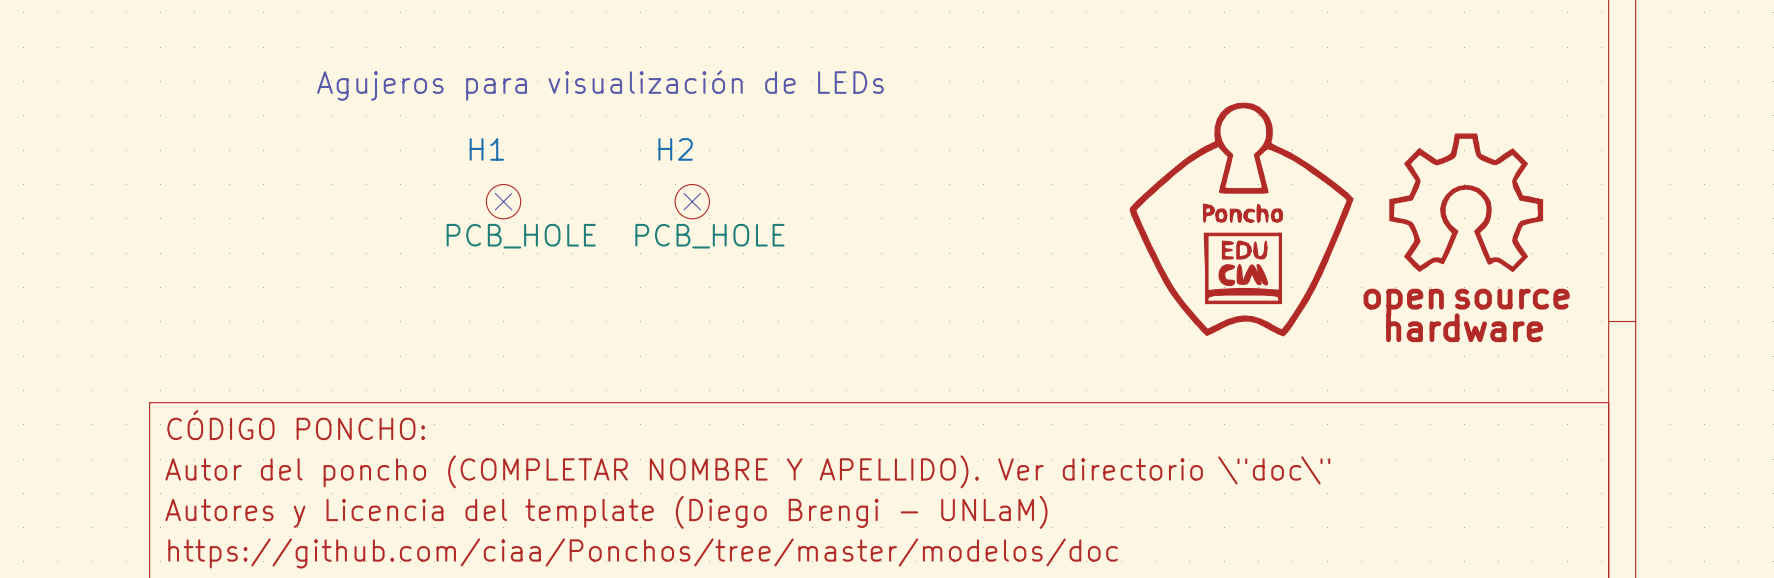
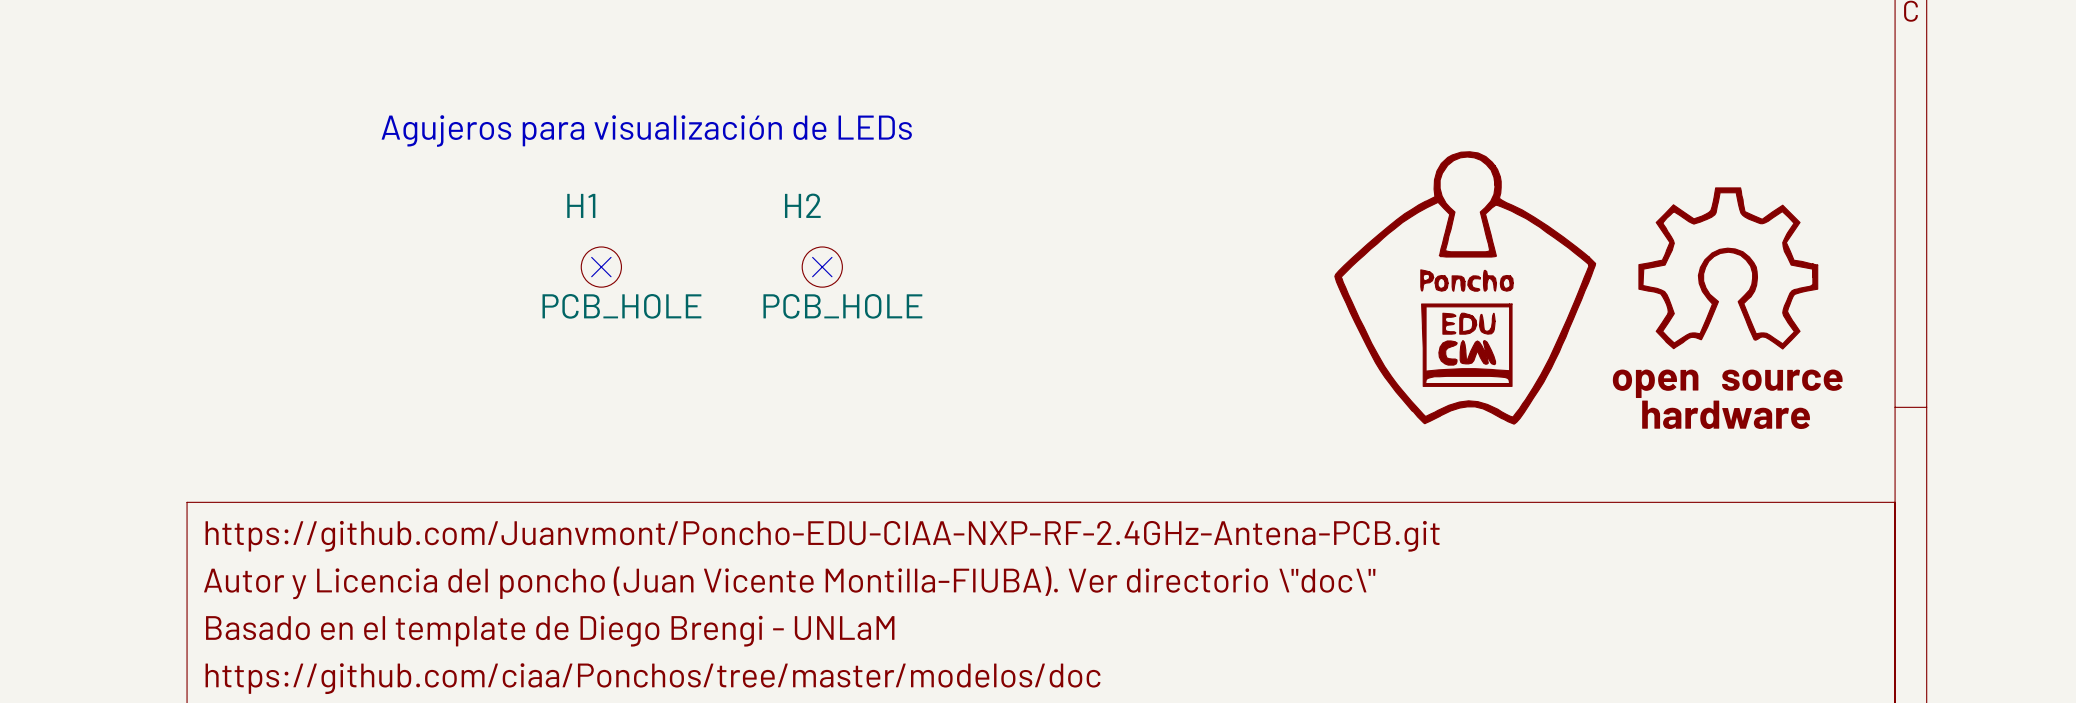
title block: CÓDIGO PONCHO: (296, 425) -> https://github.com/Juanvmont/Poncho-EDU-CIAA-NXP-RF-2.4GHz-Antena-PCB.git (822, 536)
title block: Autor del poncho (COMPLETAR NOMBRE Y APELLIDO). Ver directorio \"doc\" (747, 471) -> Autor y Licencia del poncho (Juan Vicente Montilla-FIUBA). Ver directorio \"doc\" (789, 582)
title block: Autores y Licencia del template (Diego Brengi - UNLaM) (606, 512) -> Basado en el template de Diego Brengi - UNLaM (550, 631)

